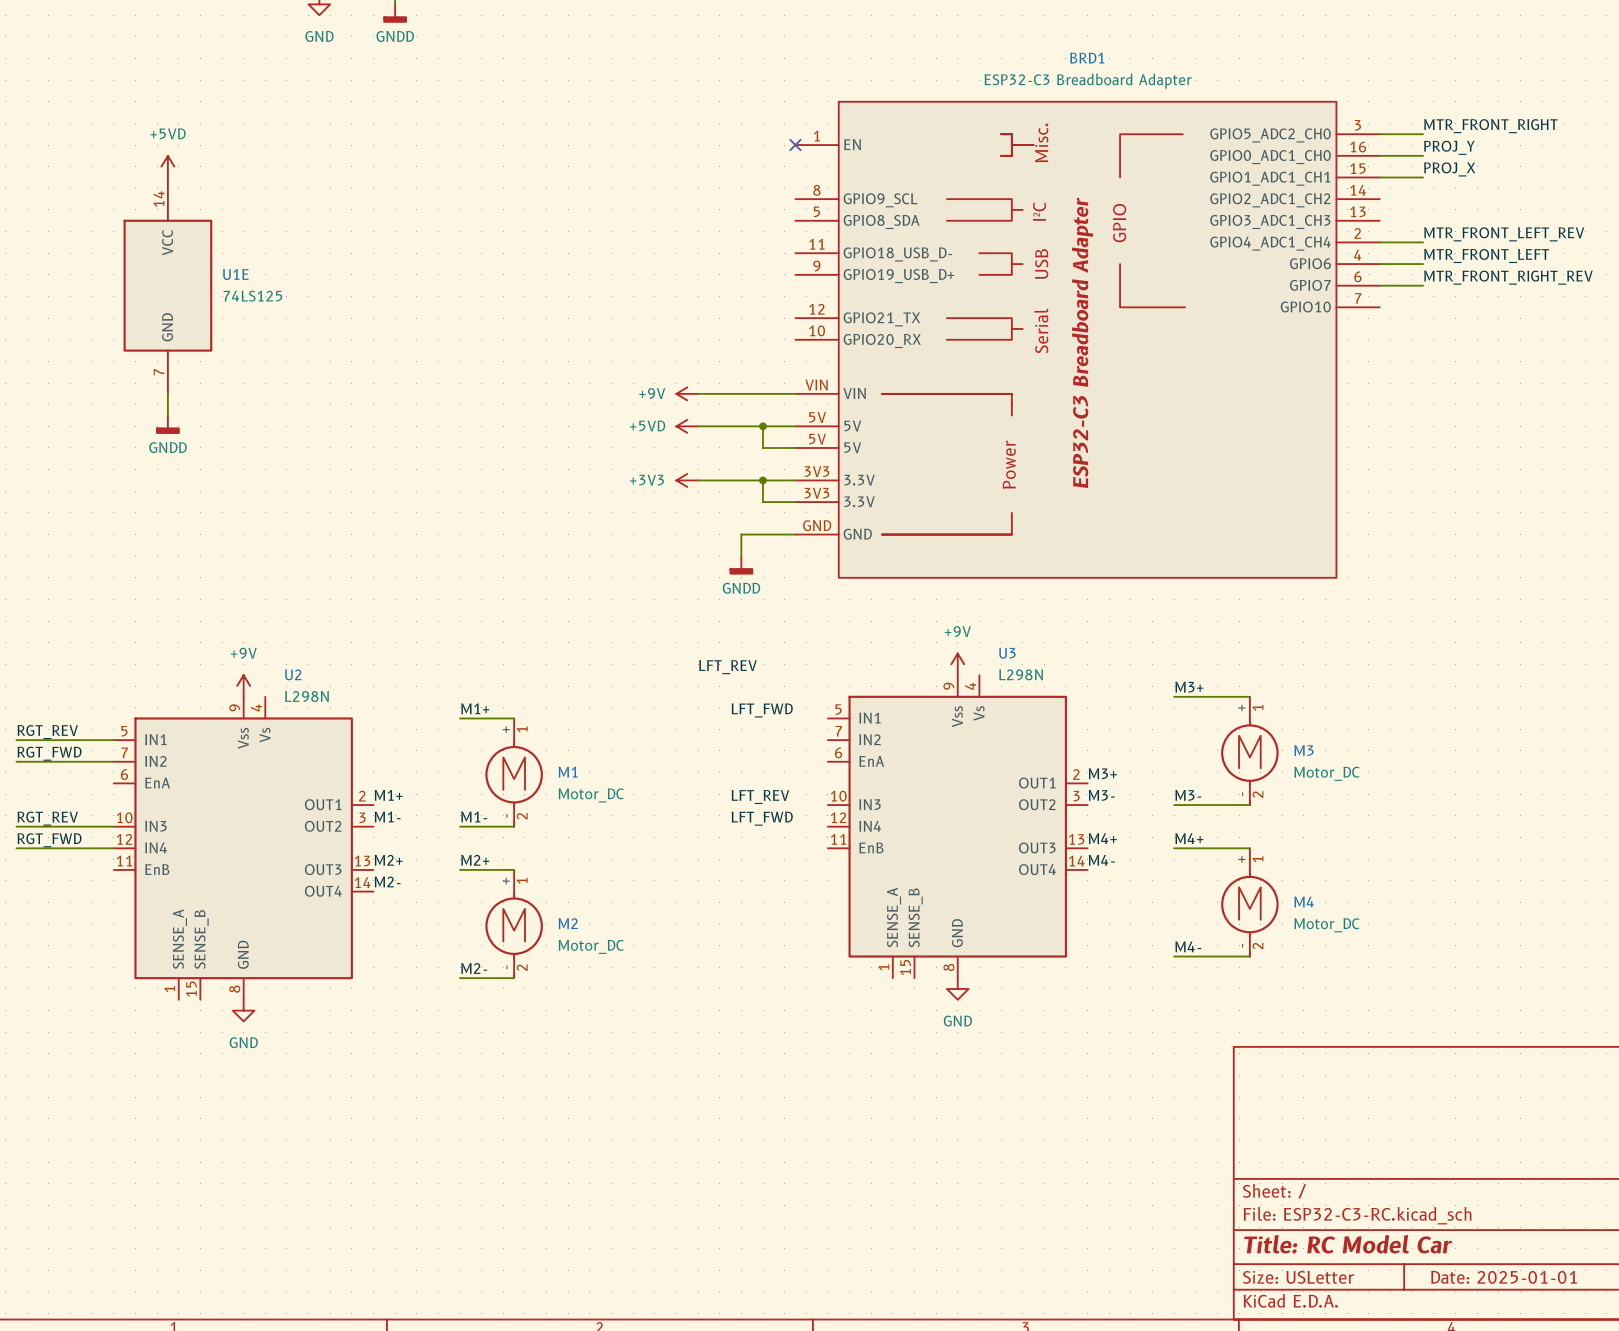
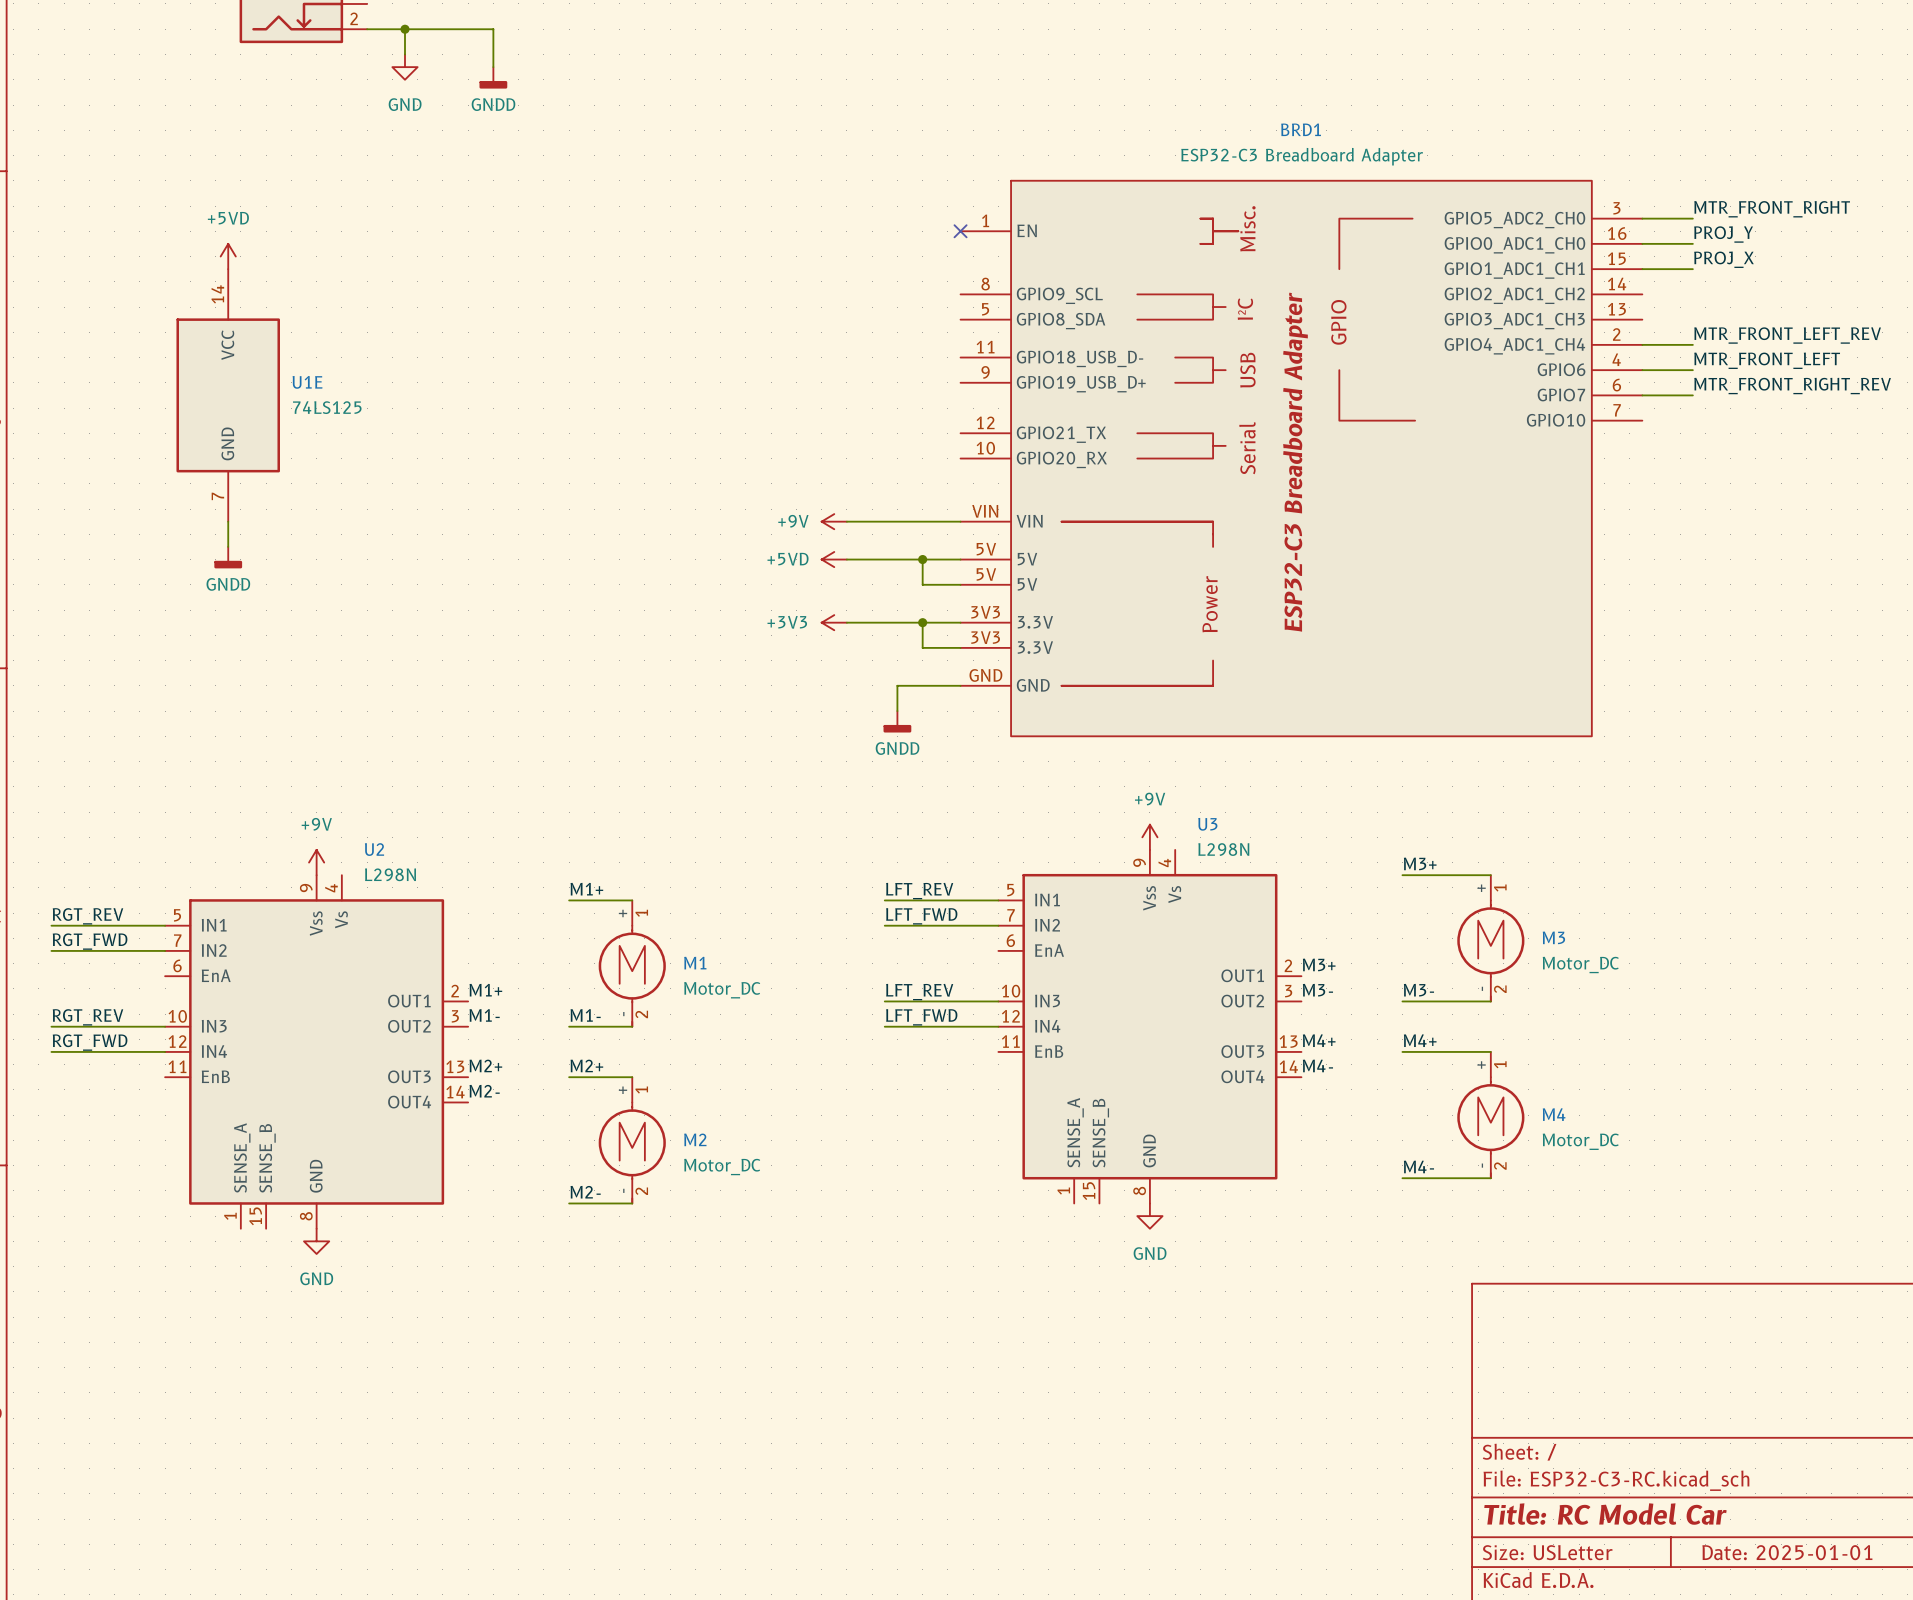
label: LFT_REV (727, 667) -> none
label: LFT_FWD (762, 710) -> LFT_REV (919, 891)
wire: none -> (884, 900) (998, 900)
label: none -> LFT_FWD (921, 916)
wire: none -> (884, 925) (998, 925)
wire: none -> (884, 1001) (998, 1001)
wire: none -> (884, 1026) (998, 1026)

